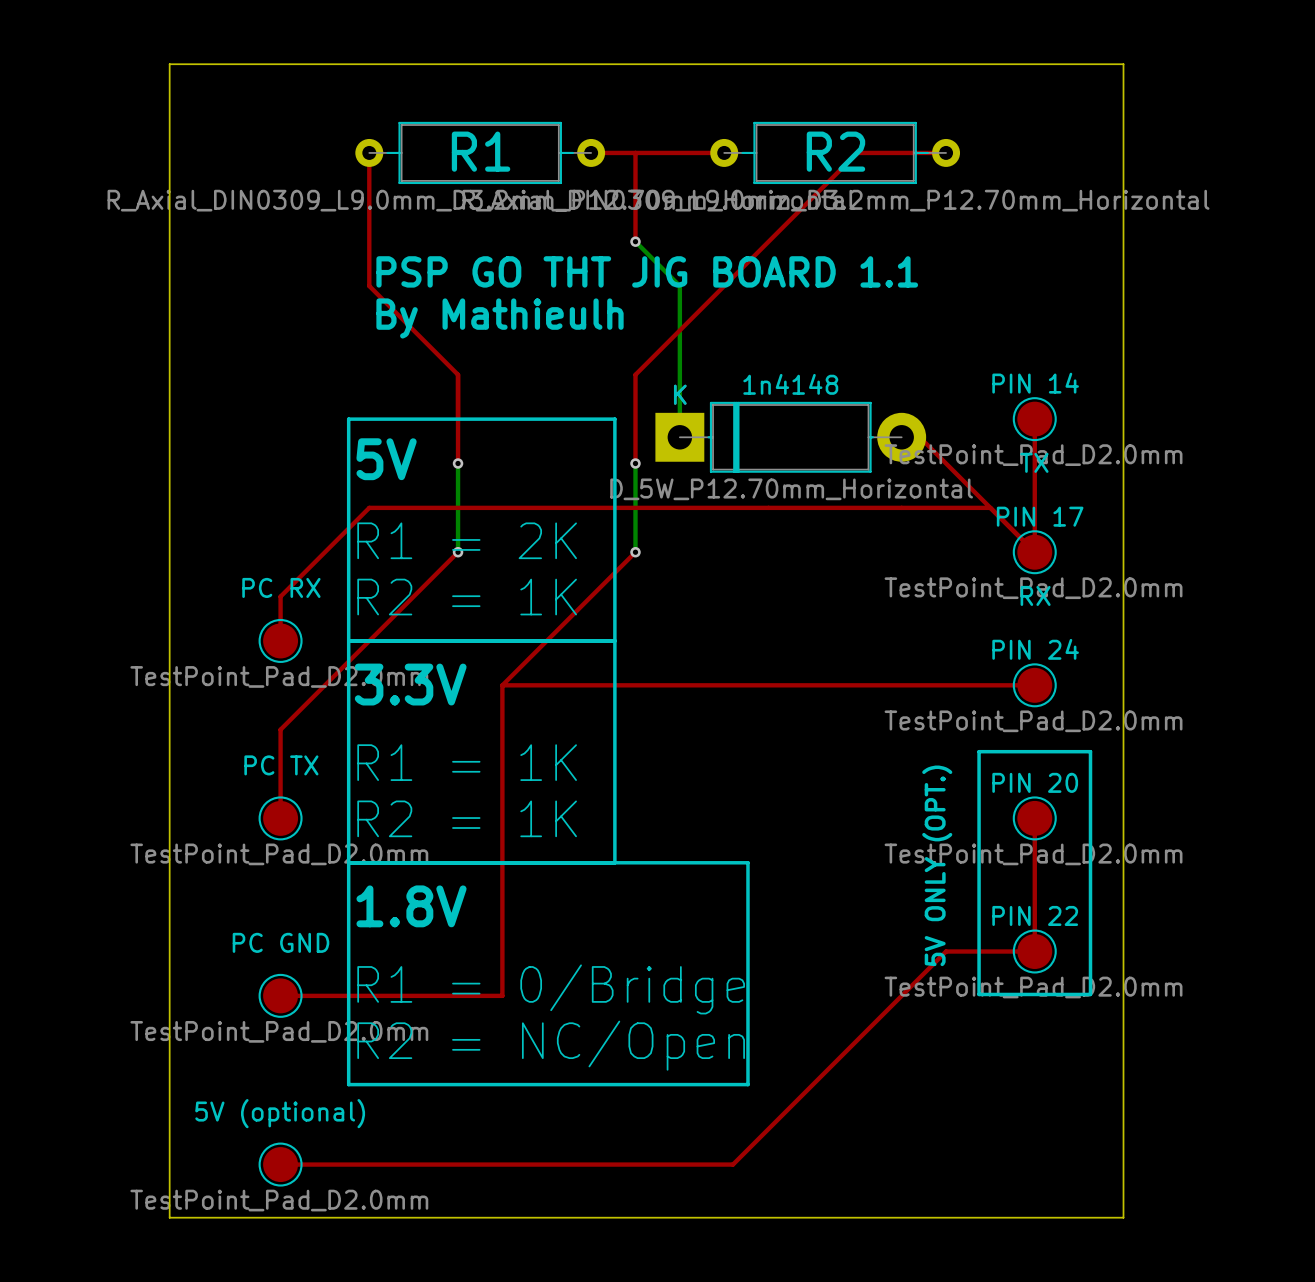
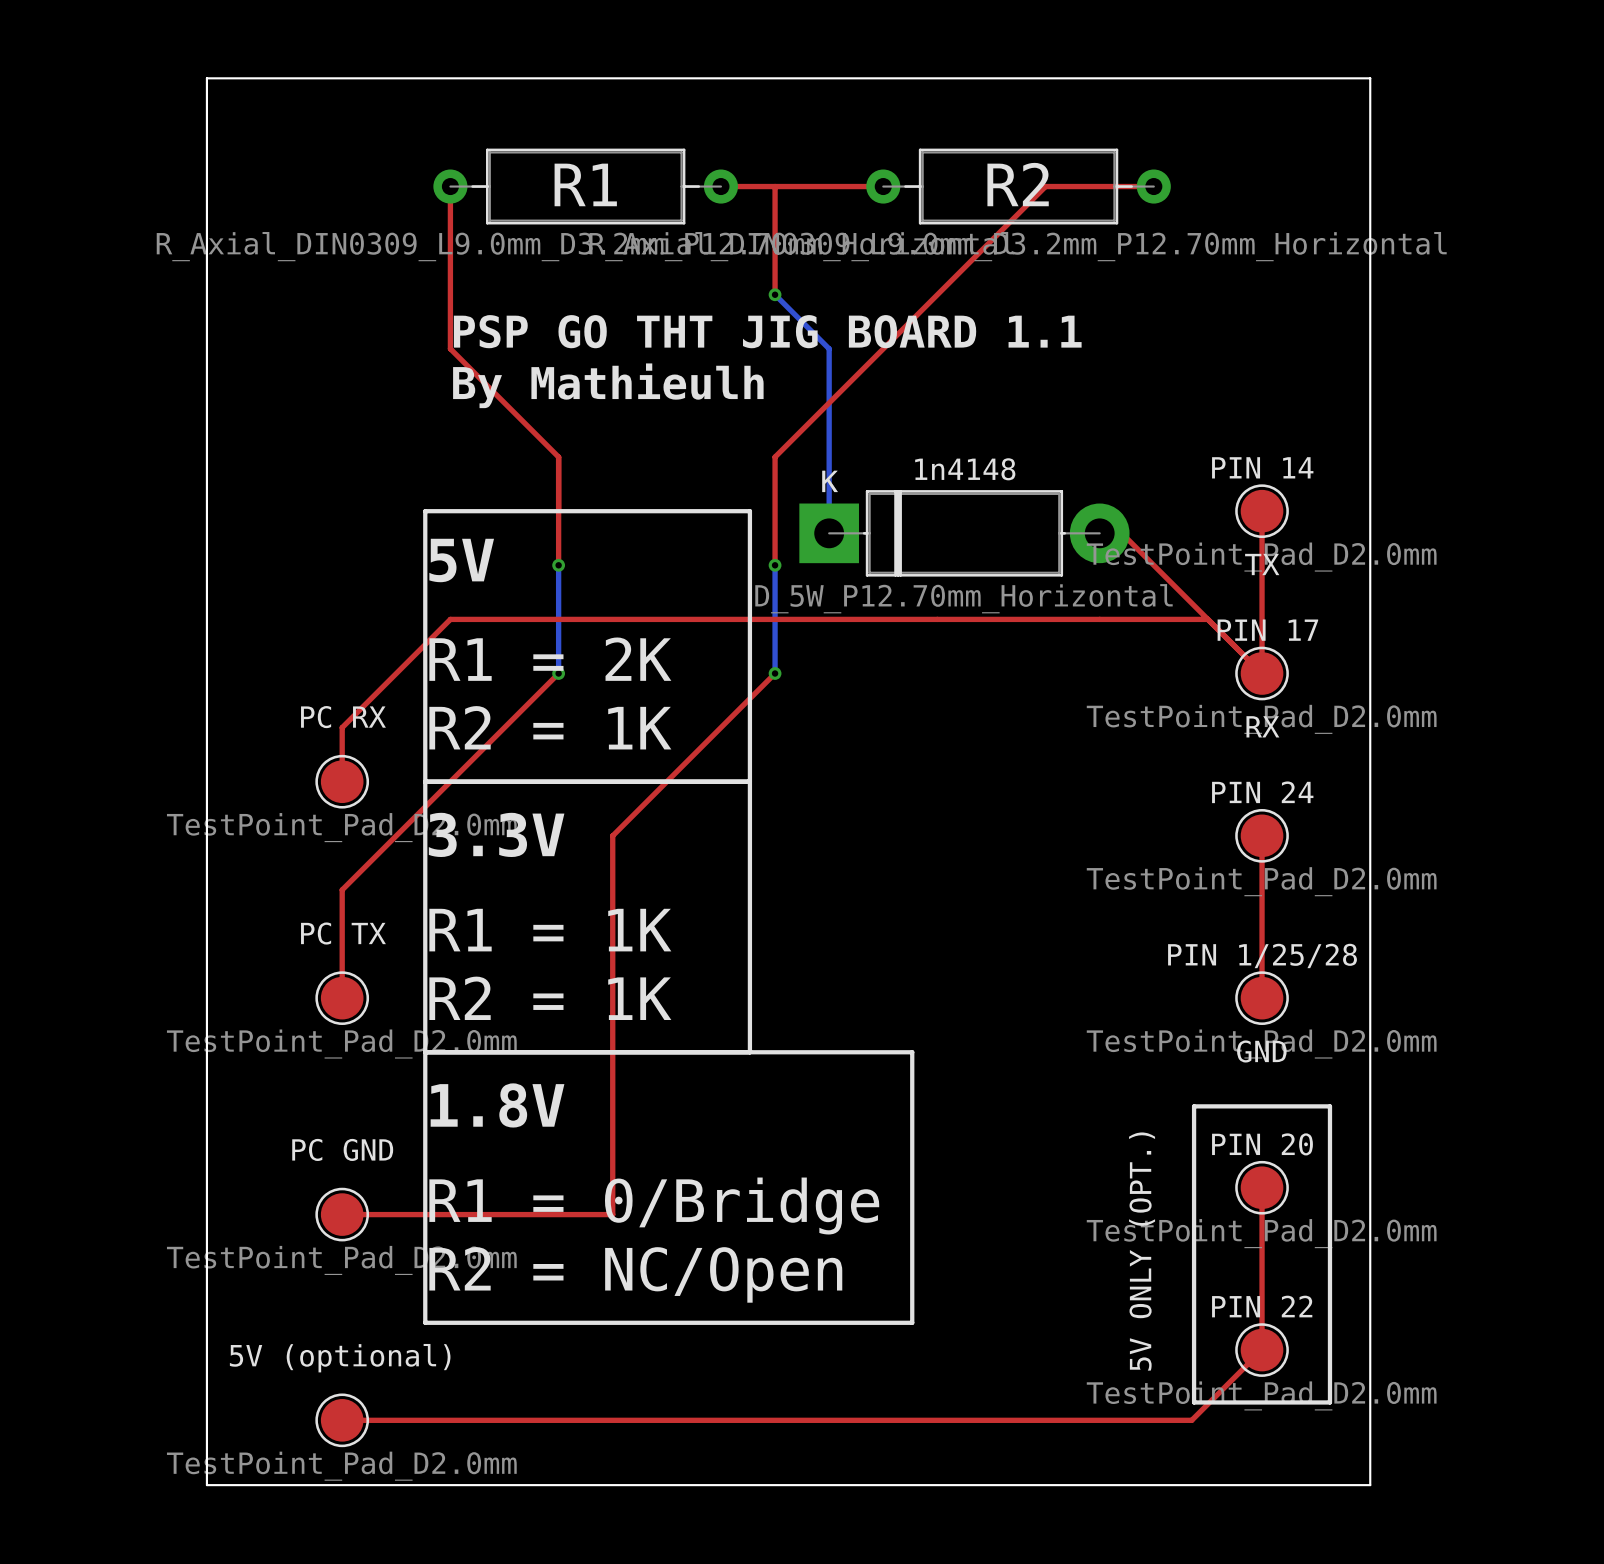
top track: (502, 685) (1034, 685) -> (1262, 998) (1262, 835)
PIN 20 name: PIN 20 (1035, 782) -> PIN 1/25/28 (1262, 955)
top track: (1034, 818) (1034, 951) (946, 951) (732, 1164) -> (1262, 1187) (1262, 1350) (1191, 1420) (893, 1420)
text: none -> GND (1261, 1051)
text position: 5V ONLY (OPT.) (937, 865) -> 5V ONLY (OPT.) (1142, 1251)
line: (979, 907) (979, 751) (1090, 751) (1090, 907) -> (1194, 1106) (1329, 1106)
PIN 22 position: (1034, 951) -> (1262, 1350)
PIN 20: none -> TestPoint_Pad_D2.0mm (1262, 1187)
line: (979, 994) (1090, 994) -> (1194, 1212) (1194, 1402) (1329, 1402) (1329, 1212)

